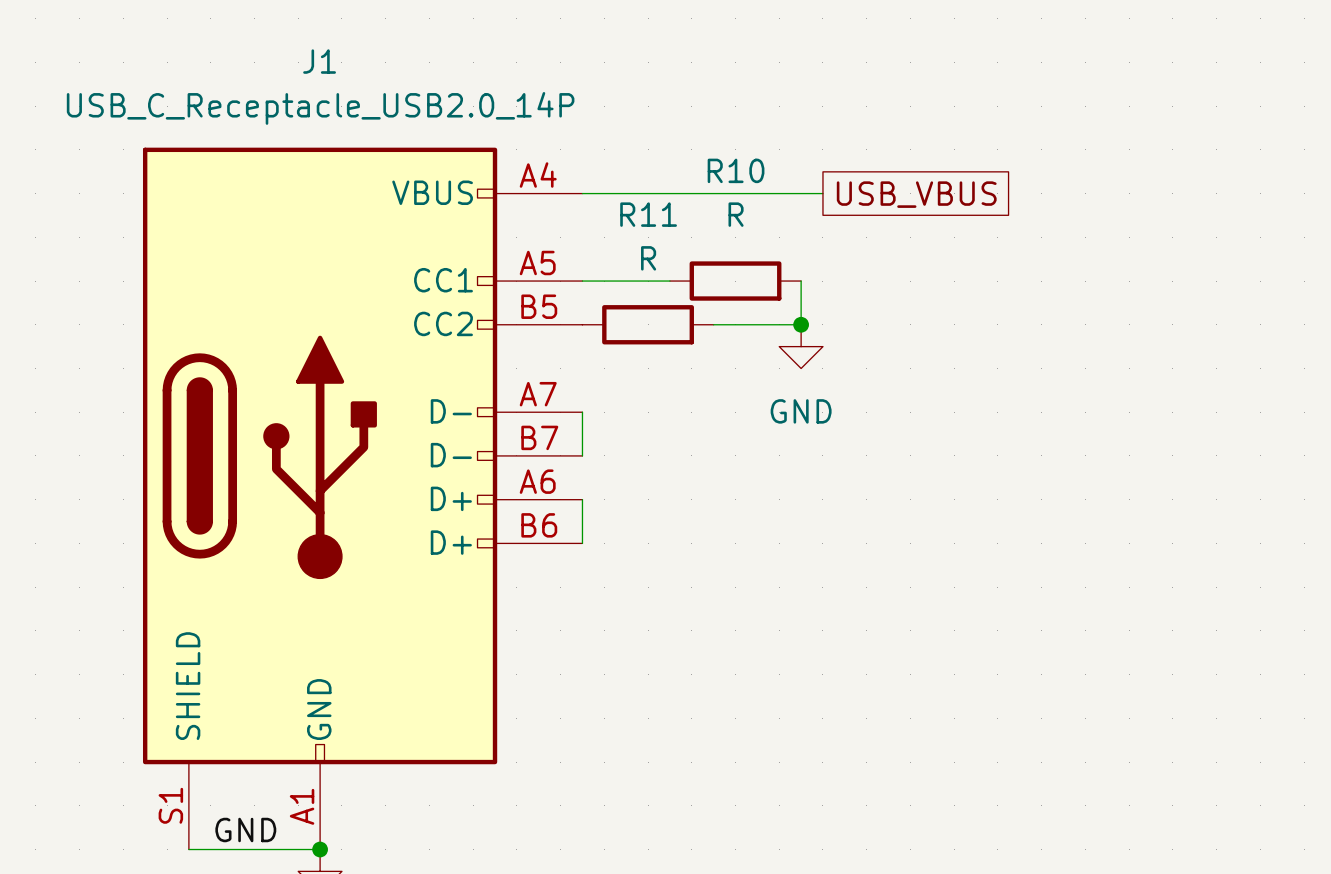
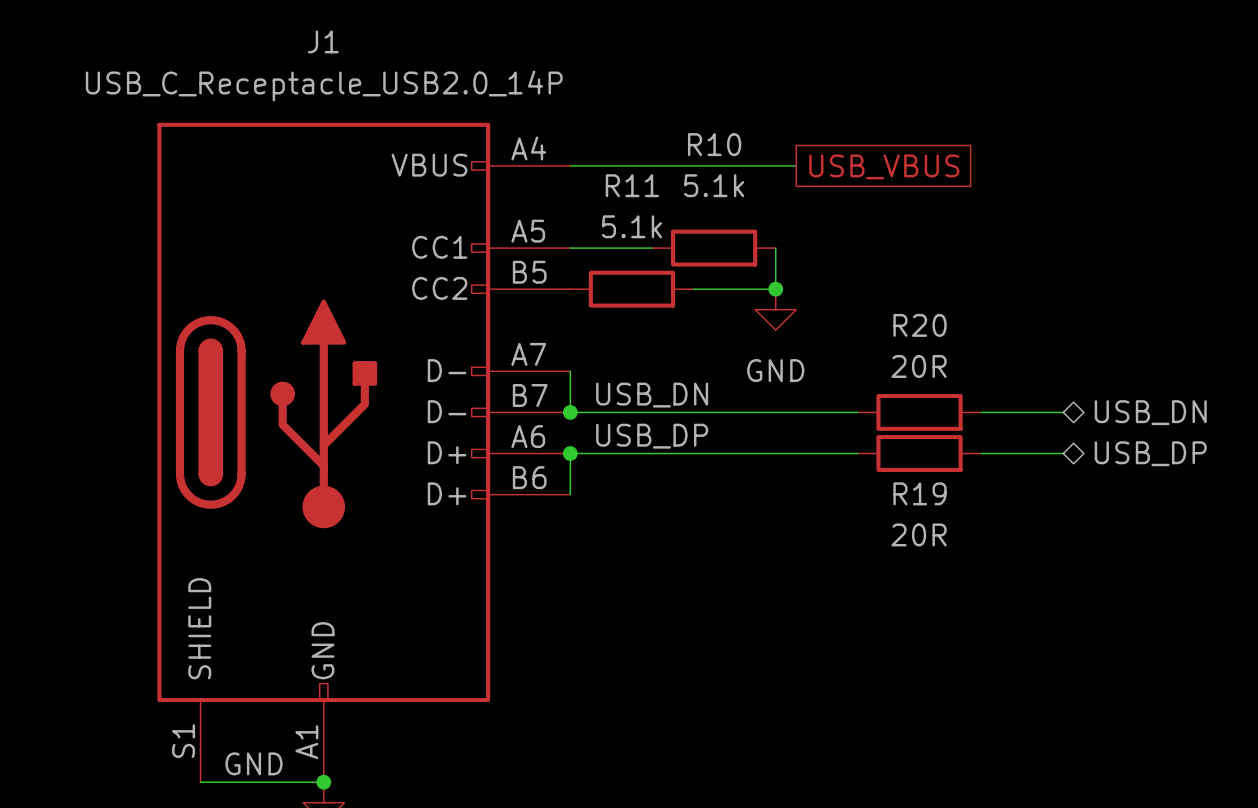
R10 value: R (736, 214) -> 5.1k (714, 185)
R11 value: R (648, 258) -> 5.1k (631, 226)
label: none -> USB_DN (652, 395)
wire: none -> (570, 412) (857, 412)
junction: none -> (570, 412)
R20: none -> 20R (919, 412)
wire: none -> (981, 412) (1063, 412)
hierarchical label: none -> USB_DN (1150, 412)
label: none -> USB_DP (652, 436)
wire: none -> (570, 453) (857, 453)
junction: none -> (570, 453)
R19: none -> 20R (919, 453)
wire: none -> (981, 453) (1063, 453)
hierarchical label: none -> USB_DP (1150, 453)

